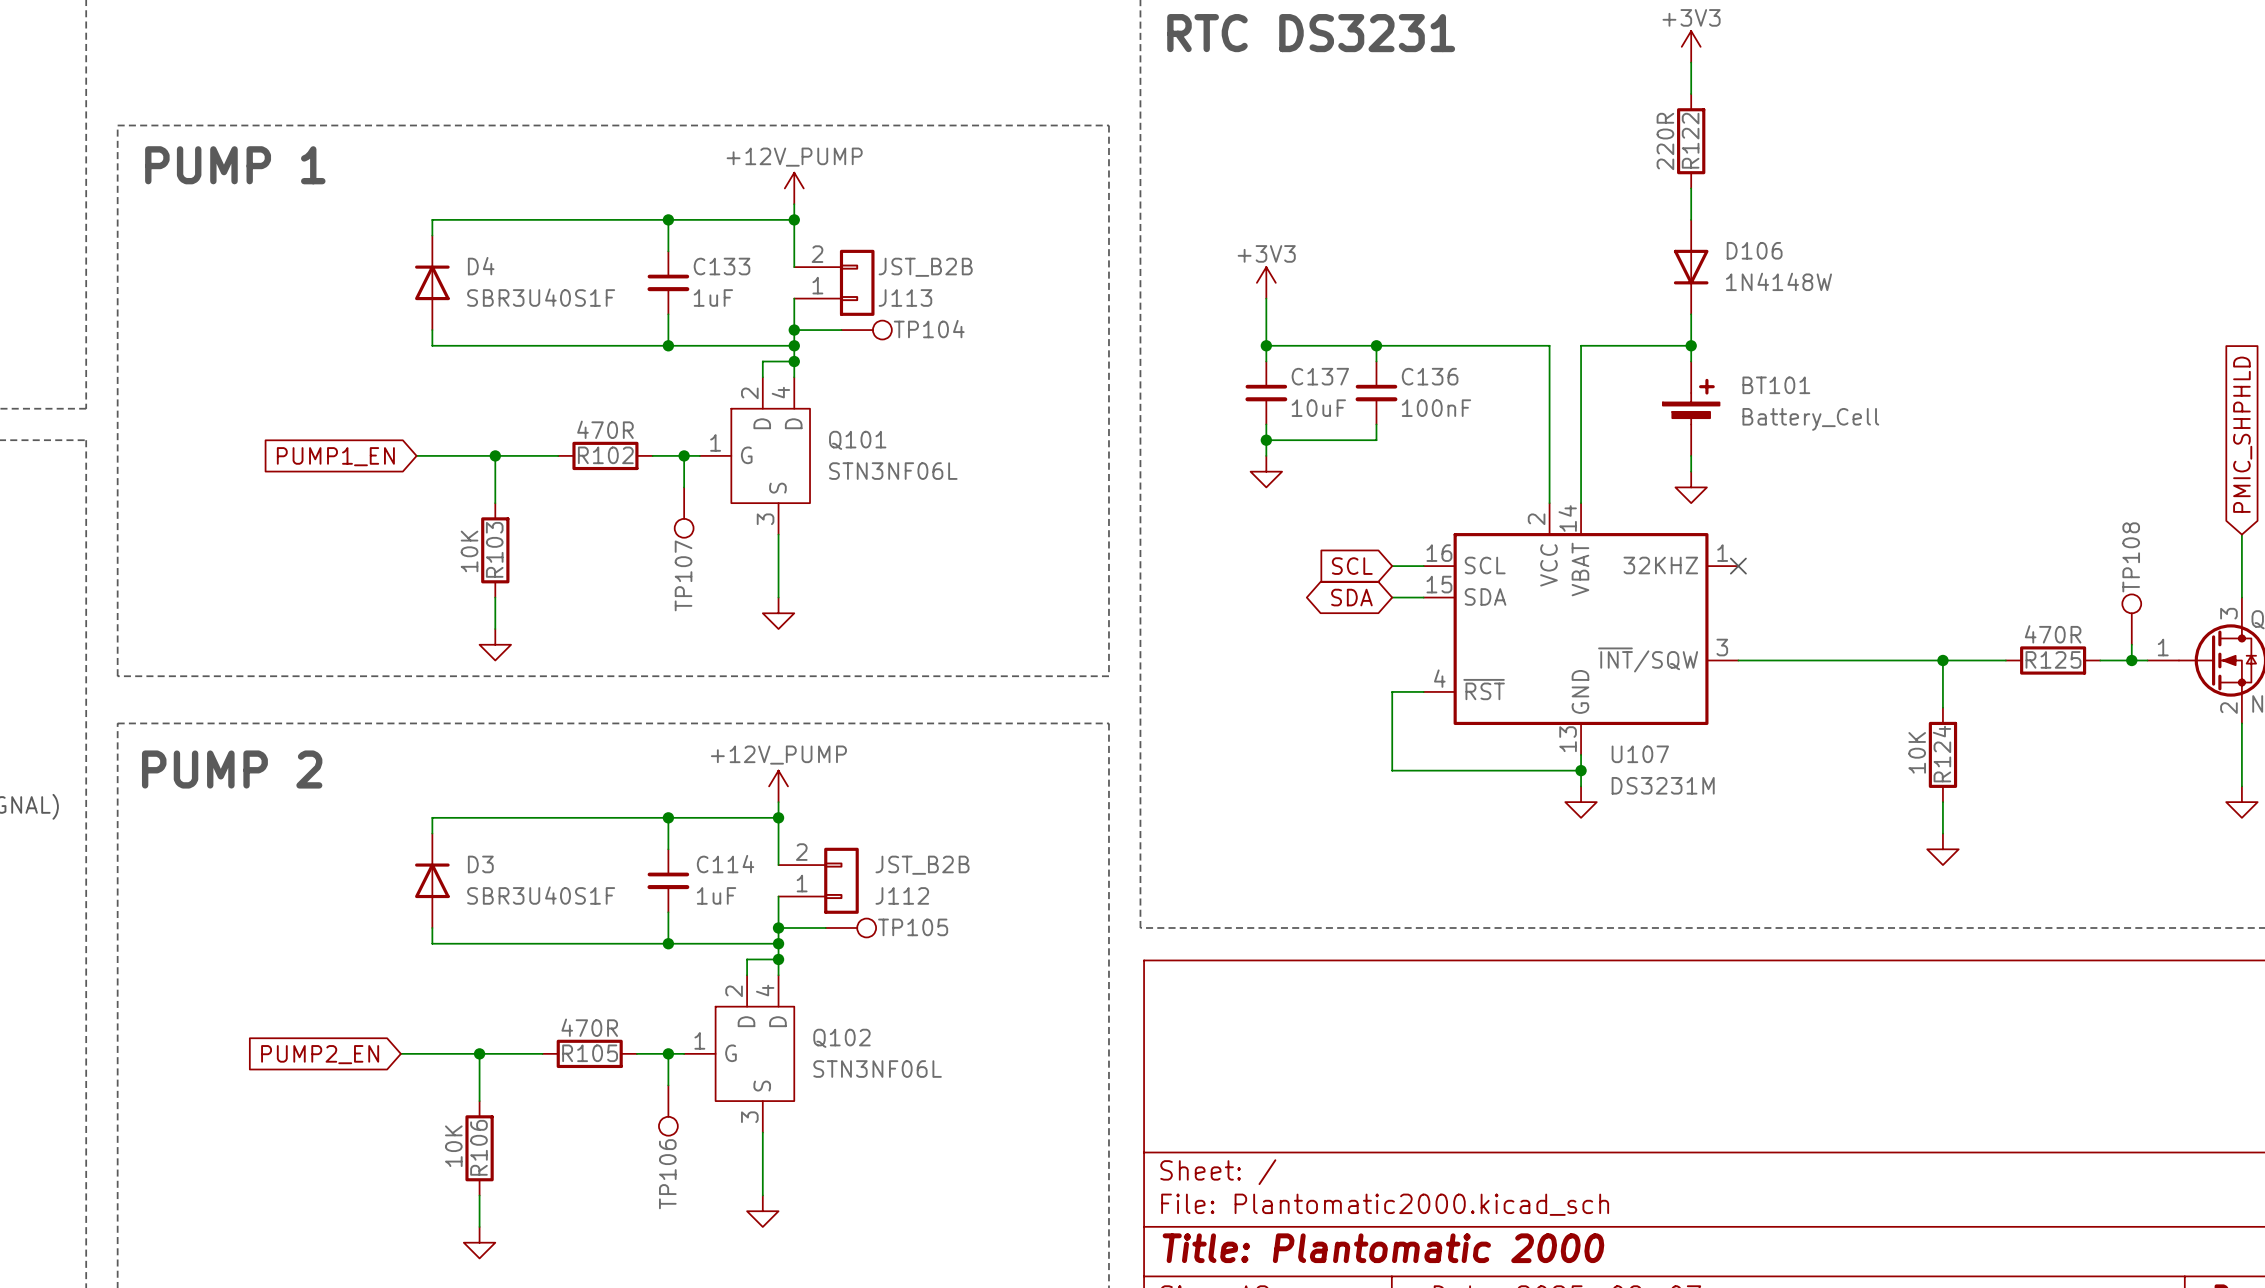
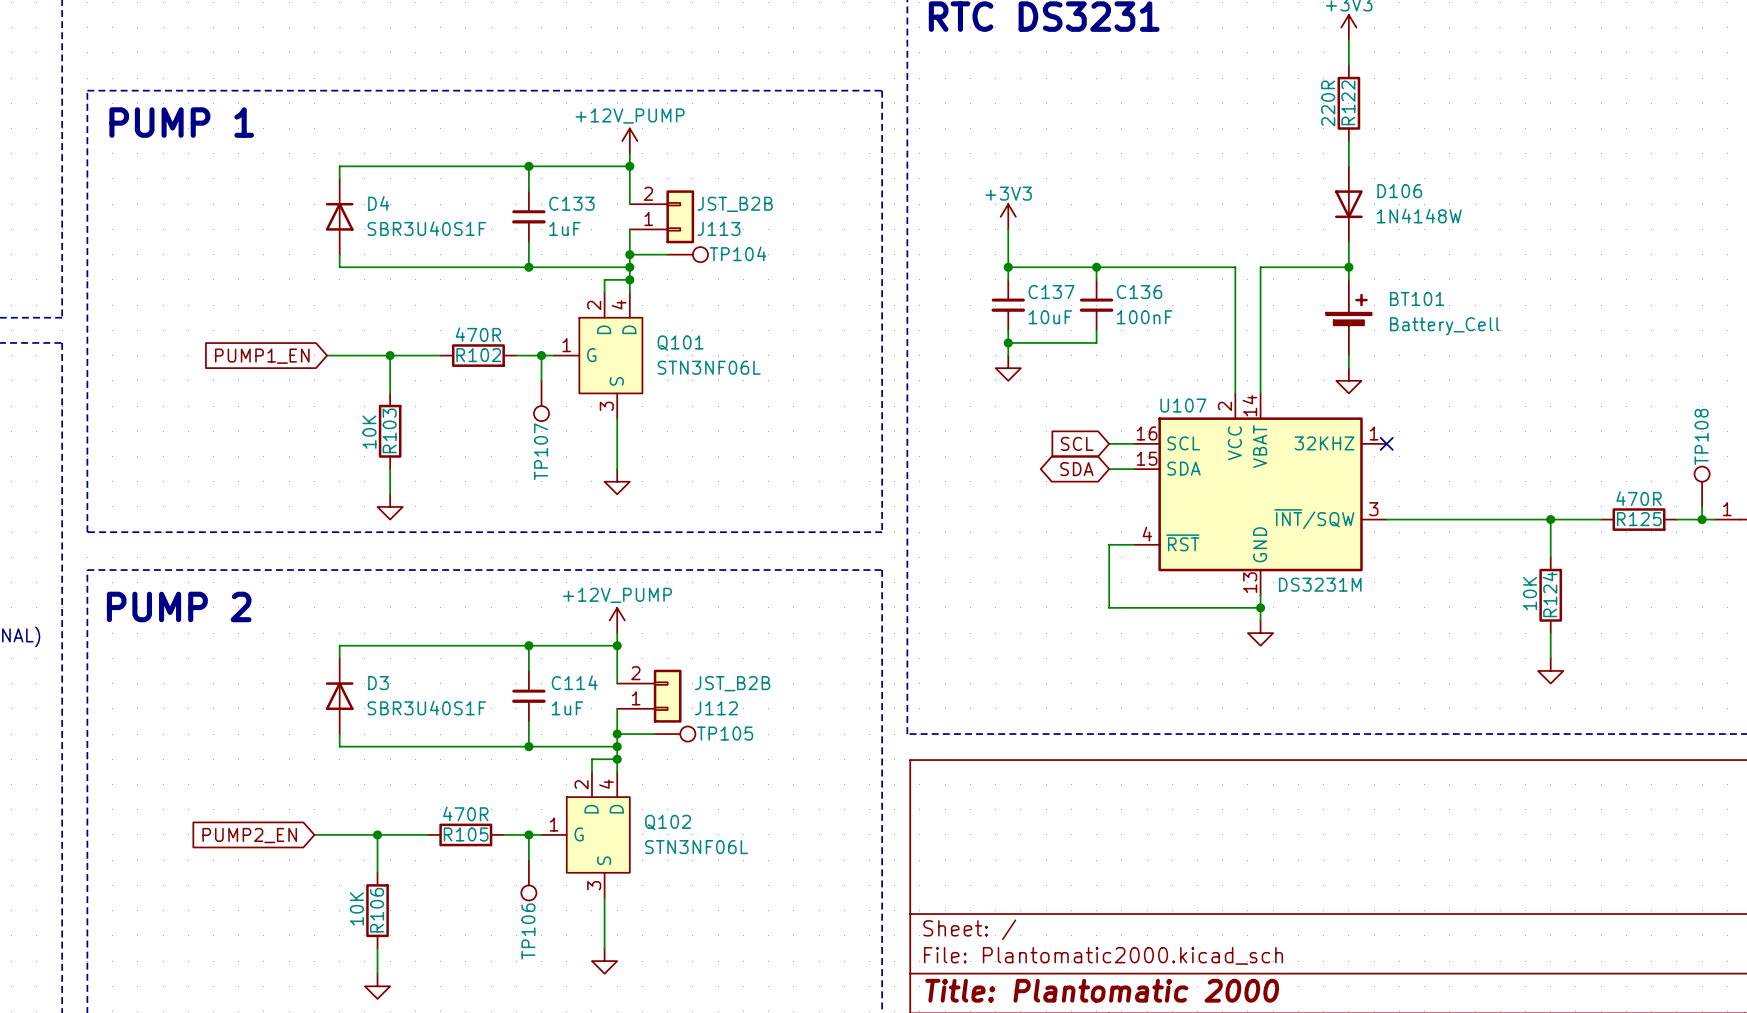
U107 name position: U107 (1640, 754) -> U107 (1183, 405)
U107 value position: DS3231M (1663, 785) -> DS3231M (1320, 584)

